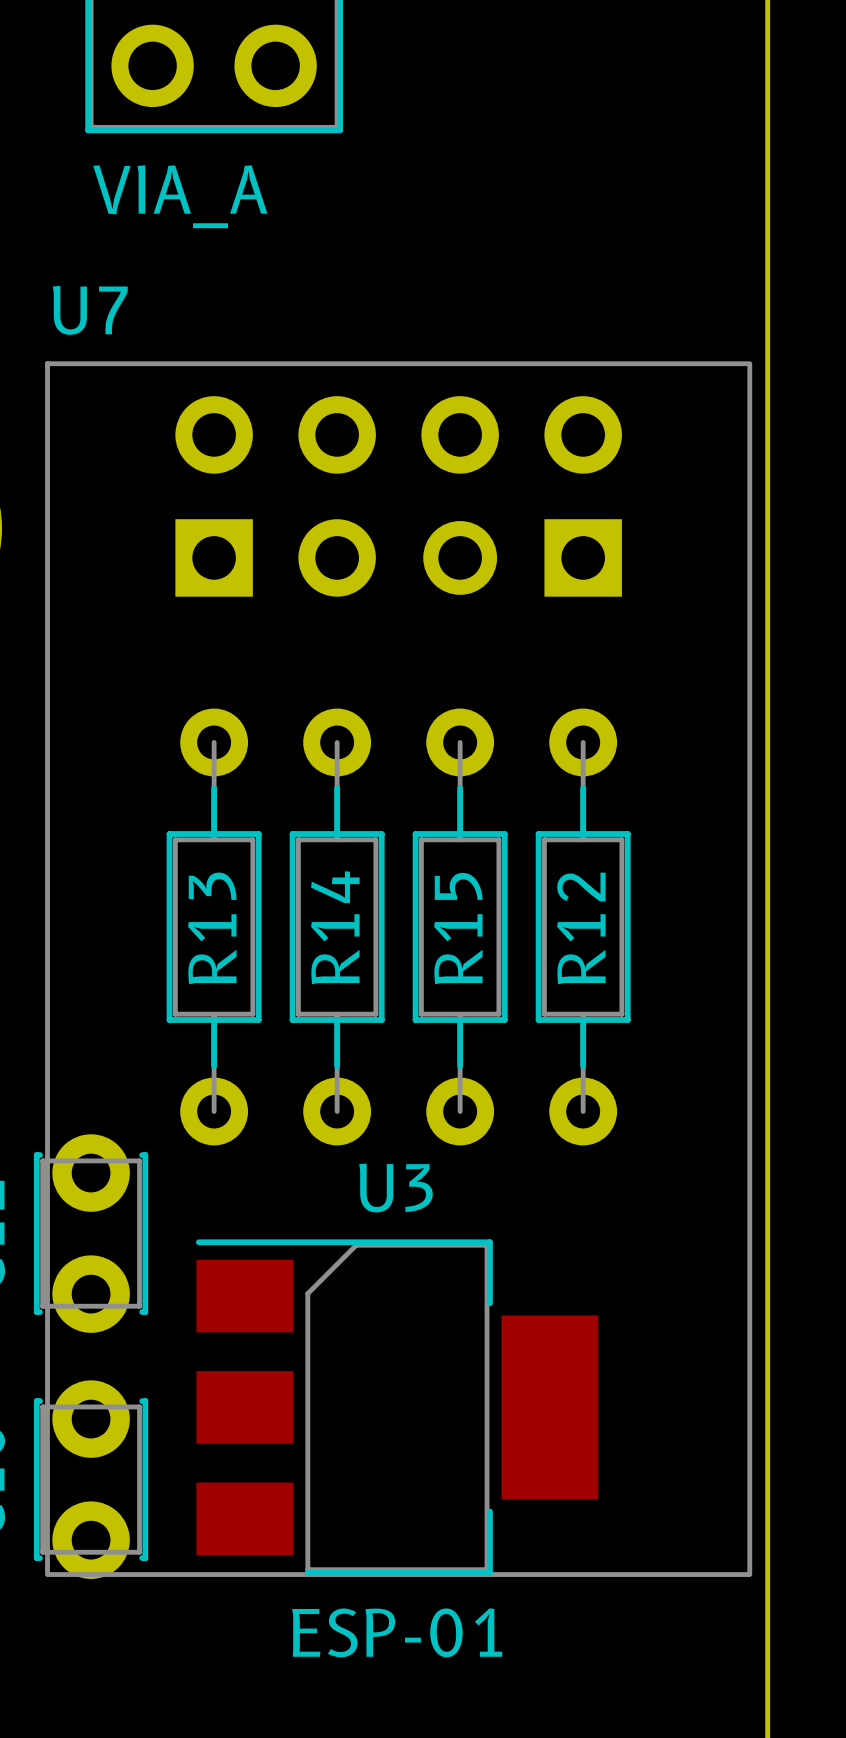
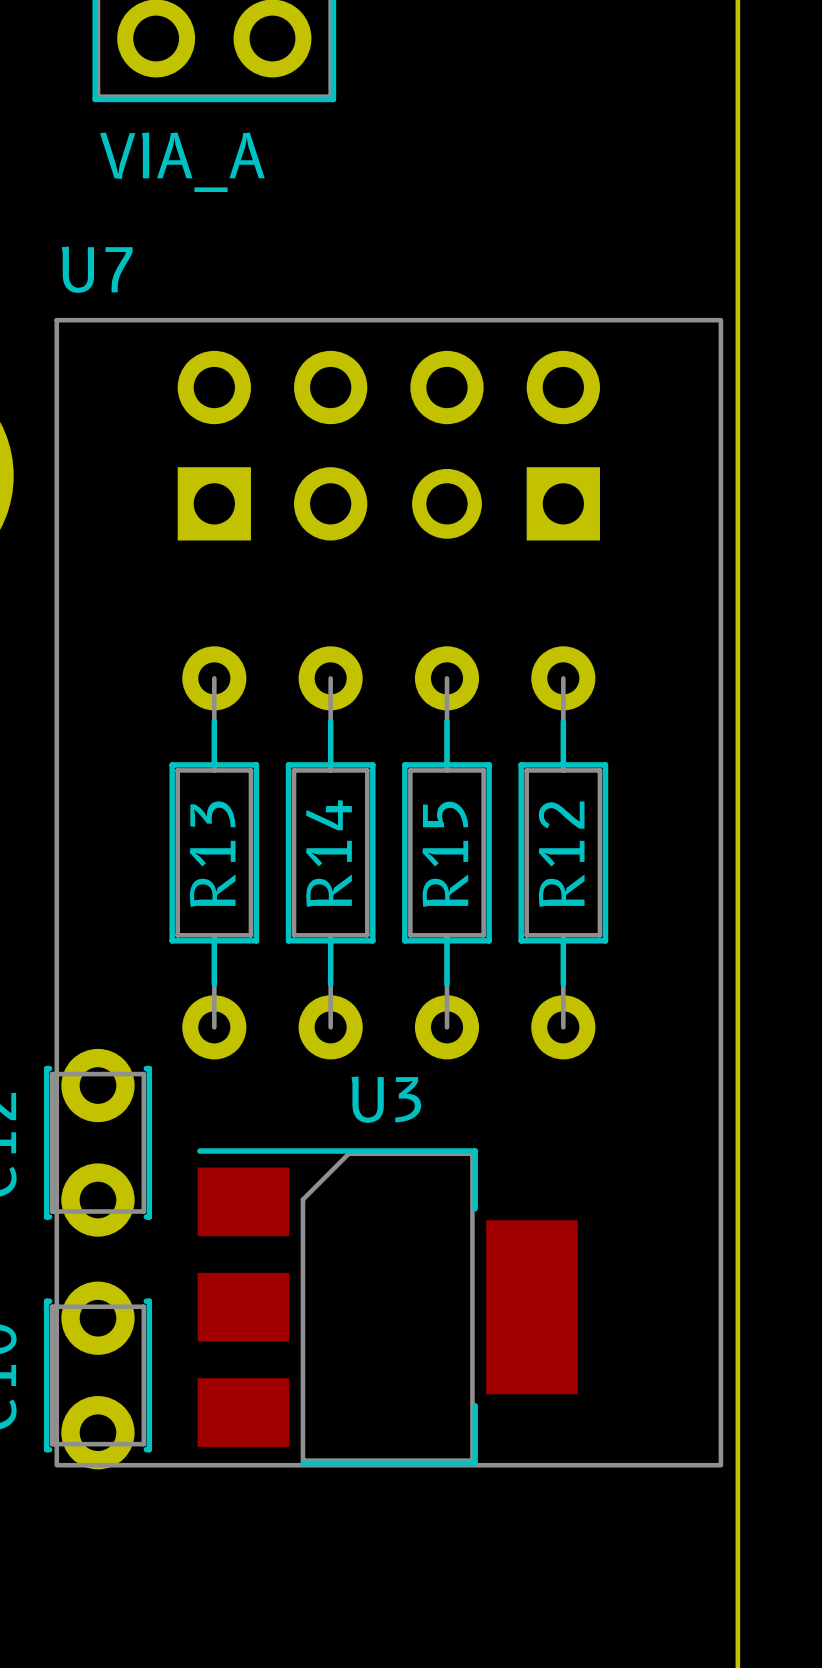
U7 value: ESP-01 (397, 1632) -> none

